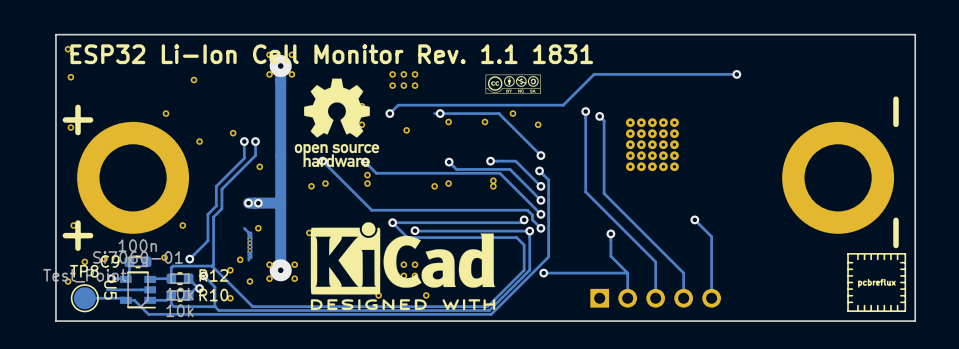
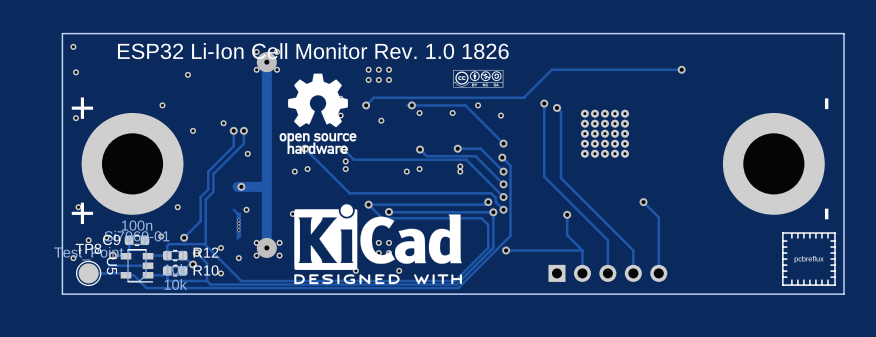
text: ESP32 Li-Ion Cell Monitor Rev. 1.1 1831 (331, 54) -> ESP32 Li-Ion Cell Monitor Rev. 1.0 1826 (313, 51)
via: (248, 203) -> none
via: none -> (241, 186)
via: (258, 203) -> none
part: (240, 259) -> none

